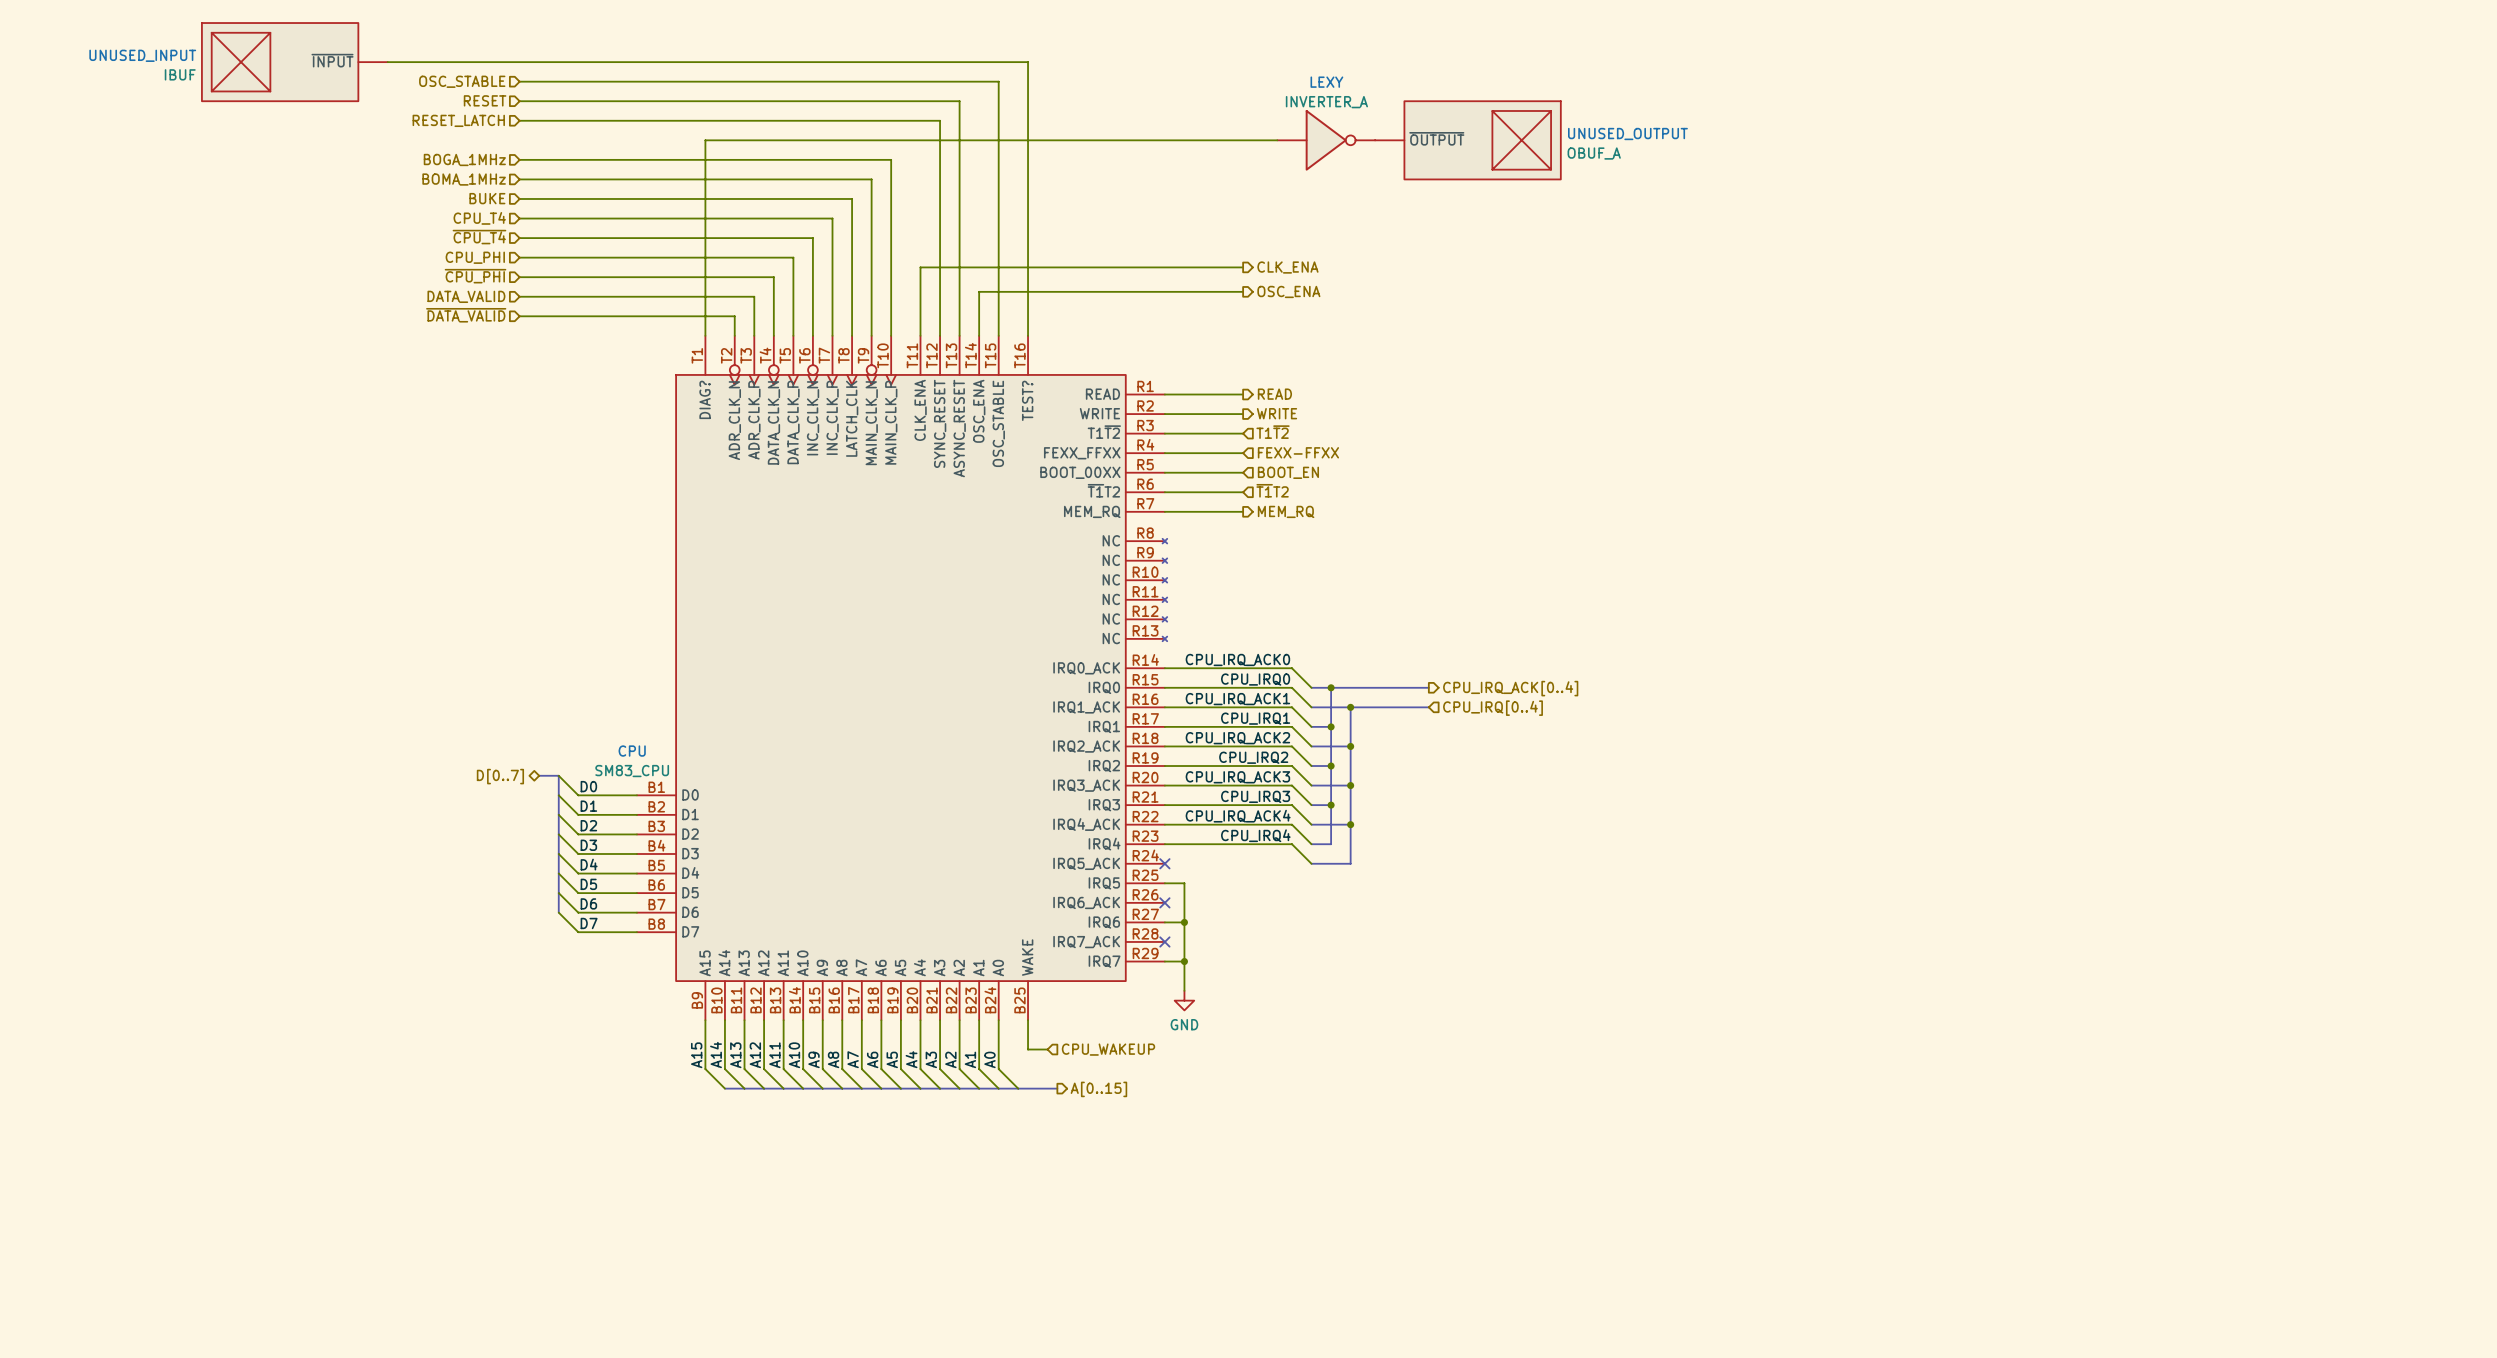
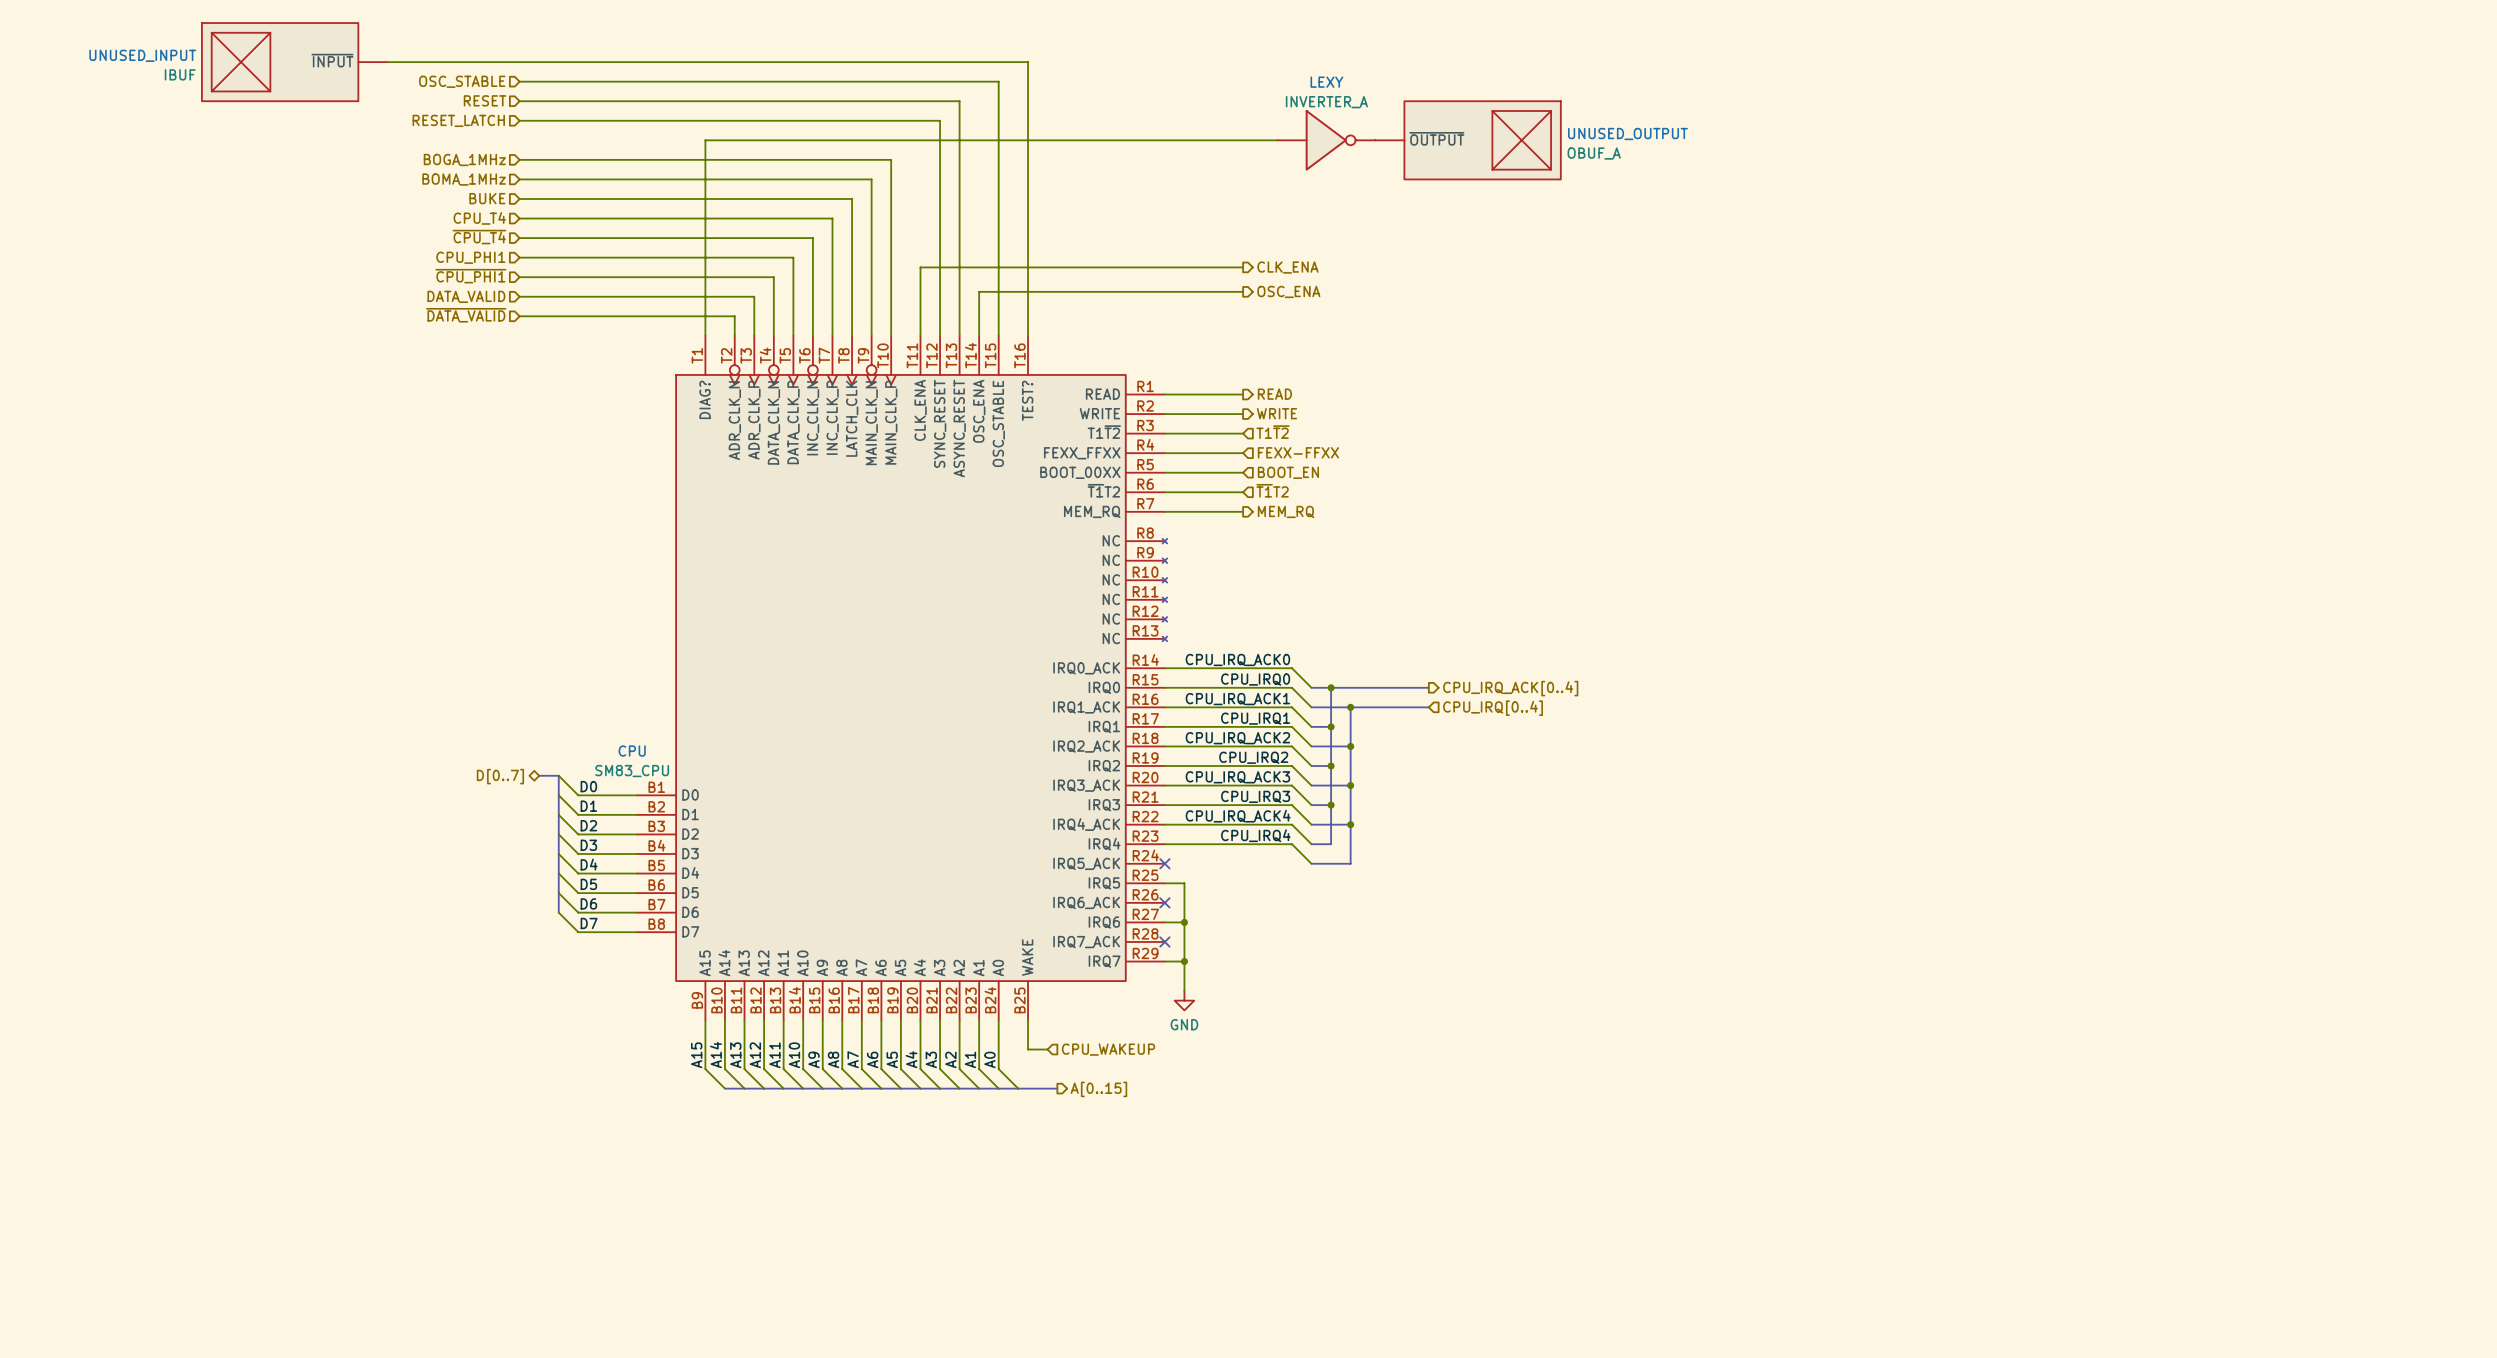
hierarchical label: CPU_PHI (475, 257) -> CPU_PHI1 (470, 257)
hierarchical label: ~{CPU_PHI} (475, 276) -> ~{CPU_PHI1} (470, 276)

